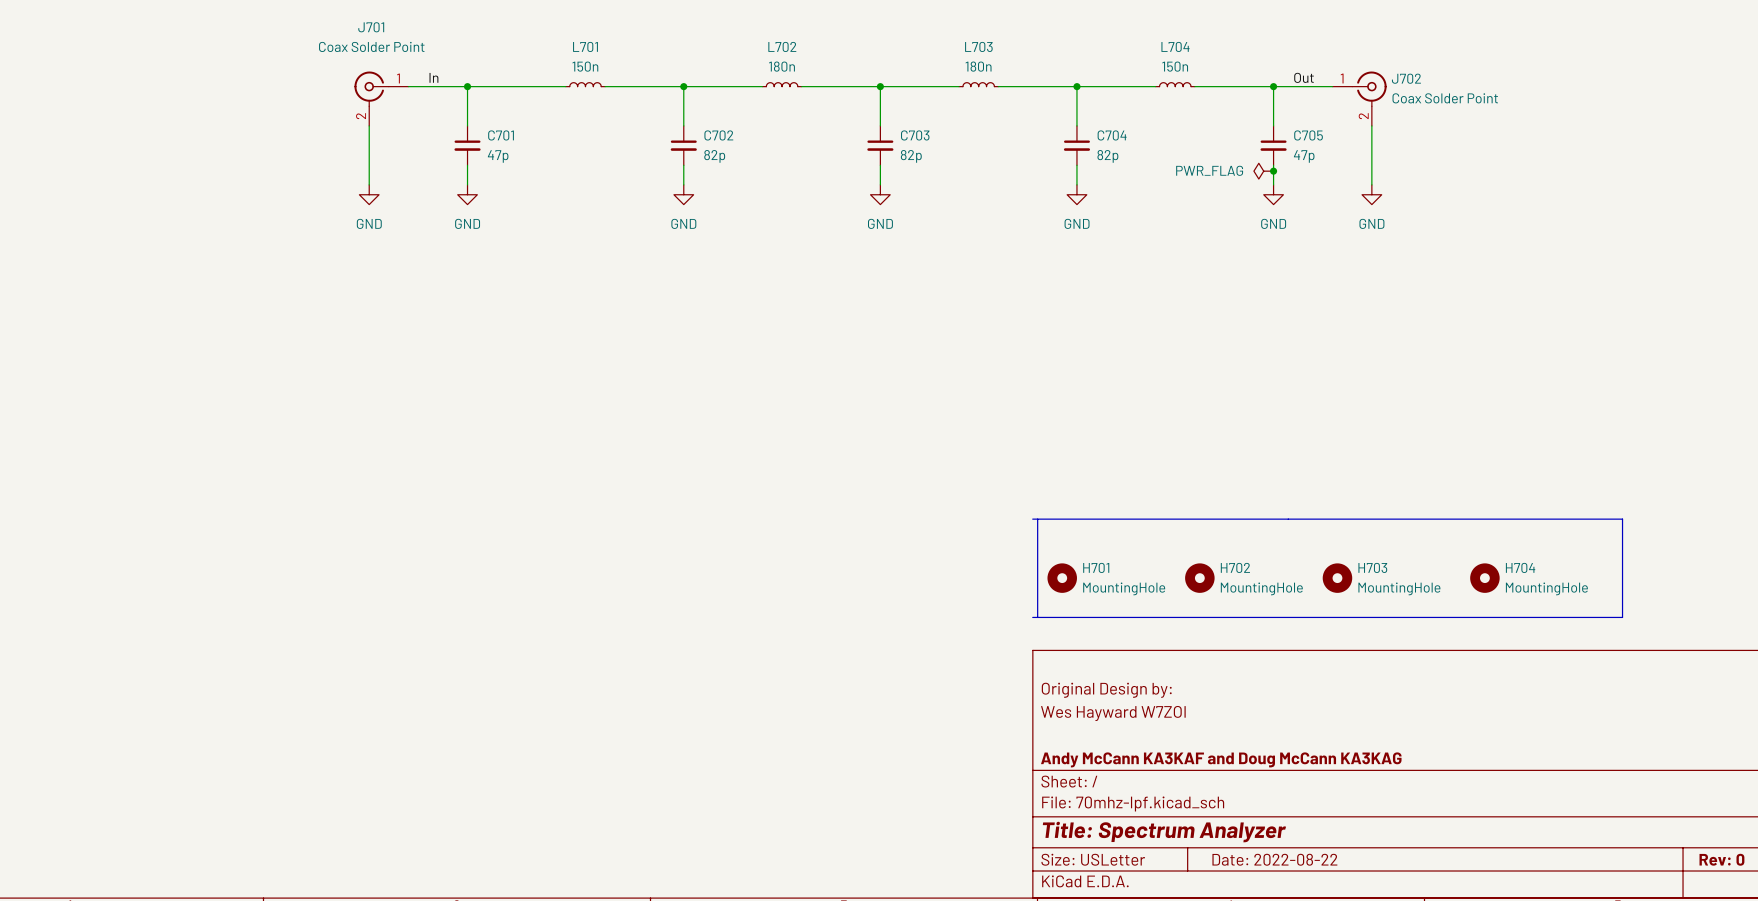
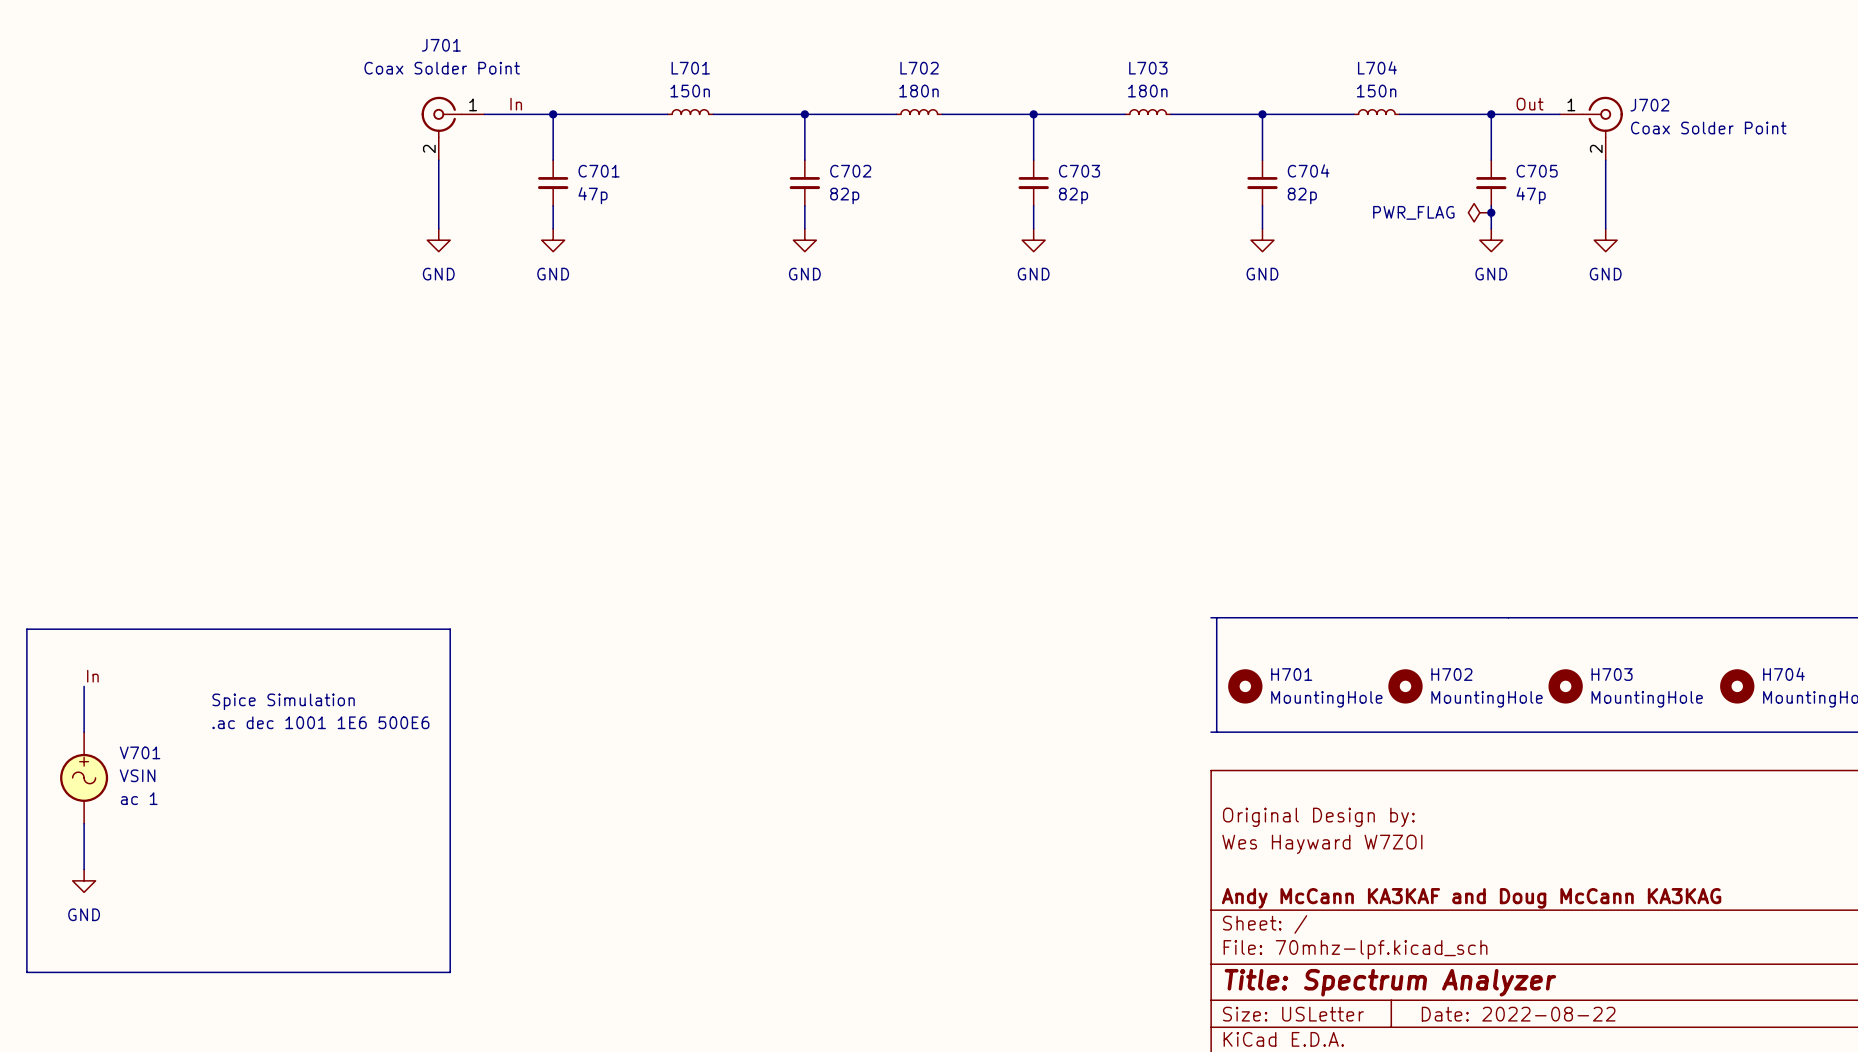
line: none -> (26, 629) (26, 972) (450, 972) (450, 629) (26, 629)
label: none -> In (92, 676)
wire: none -> (84, 686) (84, 732)
text: none -> Spice Simulation (283, 701)
text: none -> .ac dec 1001 1E6 500E6 (320, 722)
V701: none -> VSIN (84, 777)
wire: none -> (84, 823) (84, 869)
power symbol: none -> GND (84, 880)

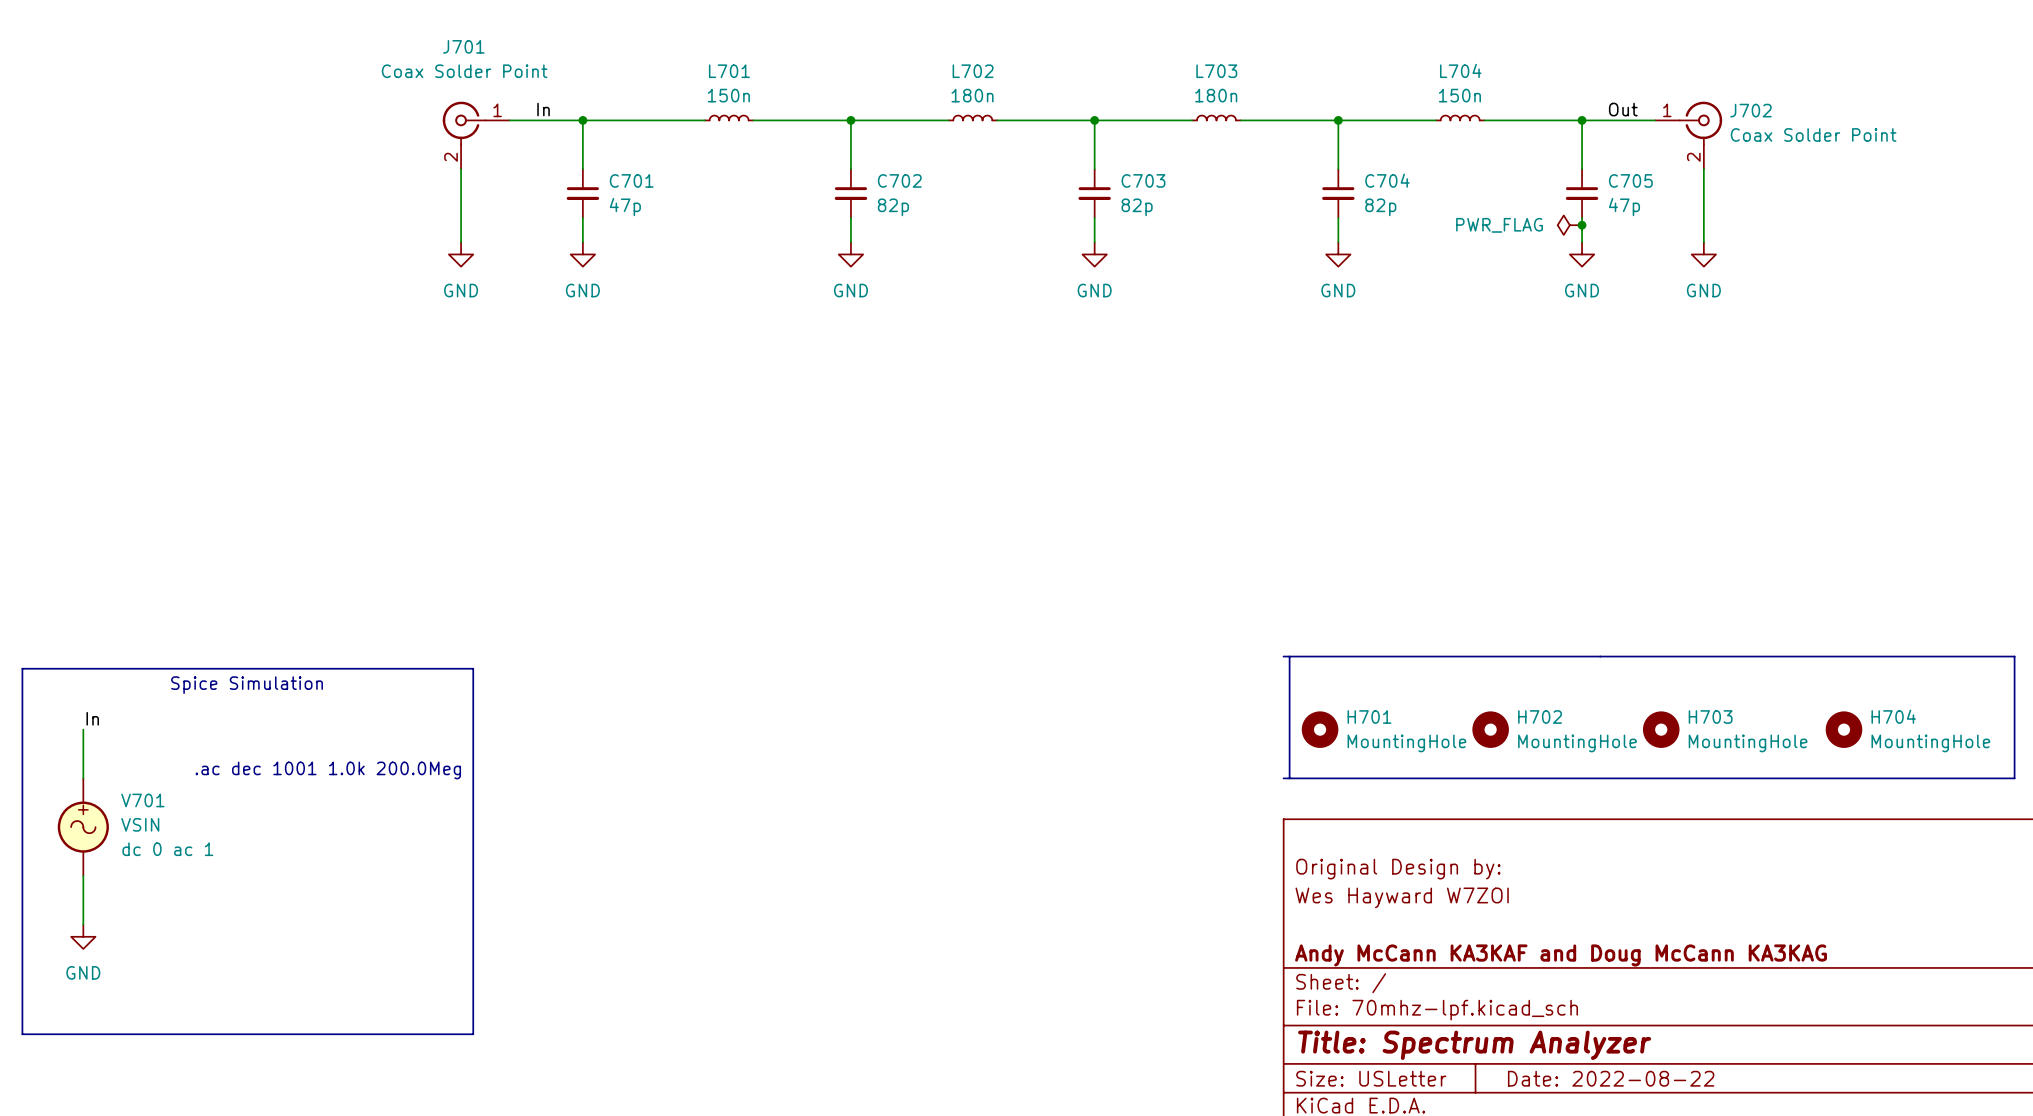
text position: Spice Simulation (283, 701) -> Spice Simulation (247, 685)
text: .ac dec 1001 1E6 500E6 (320, 722) -> .ac dec 1001 1.0k 200.0Meg (328, 770)
V701 text: ac 1 (139, 798) -> dc 0 ac 1 (167, 849)

